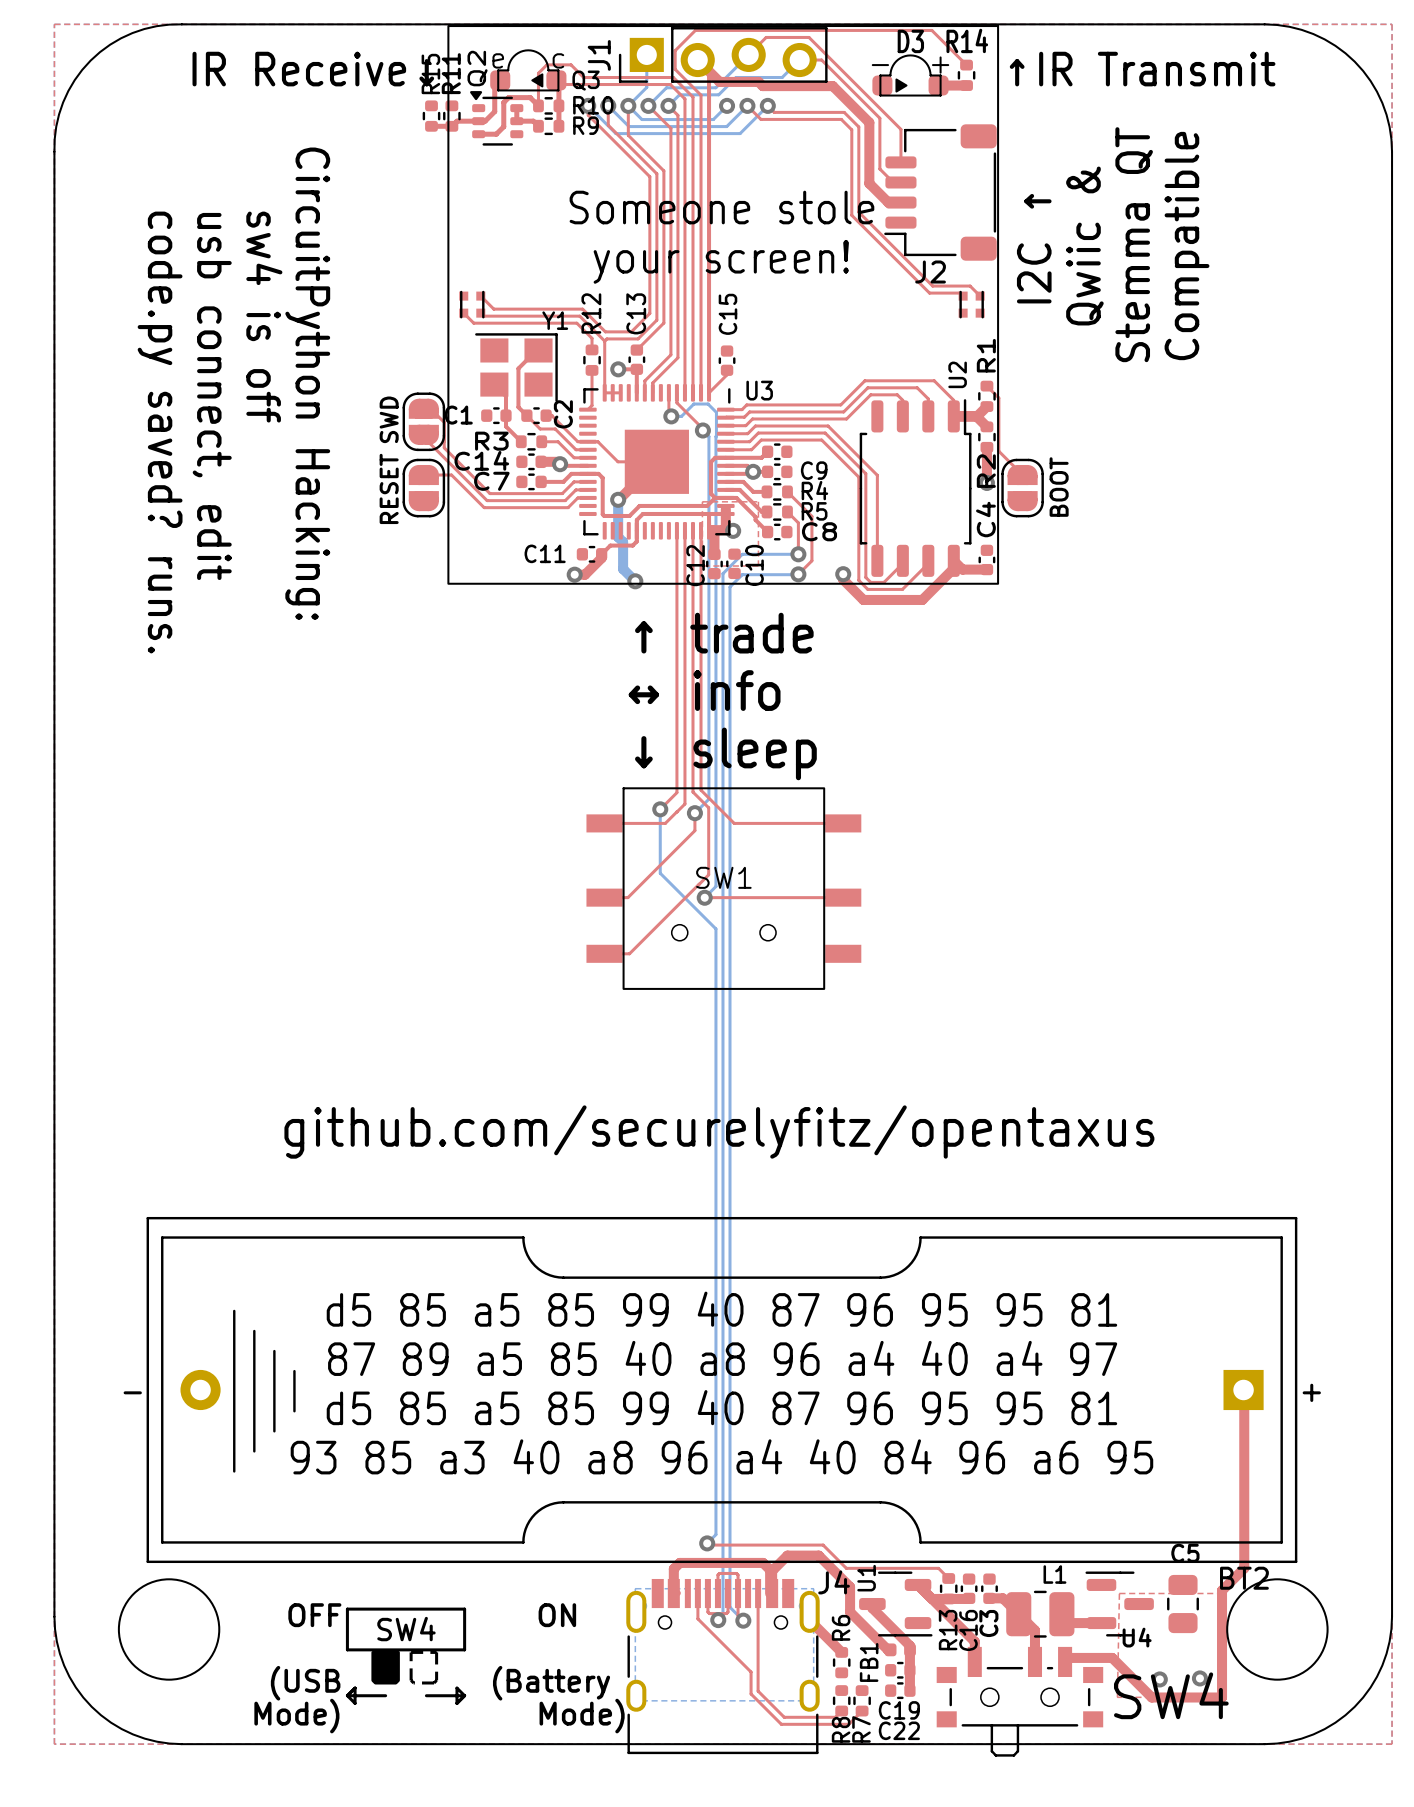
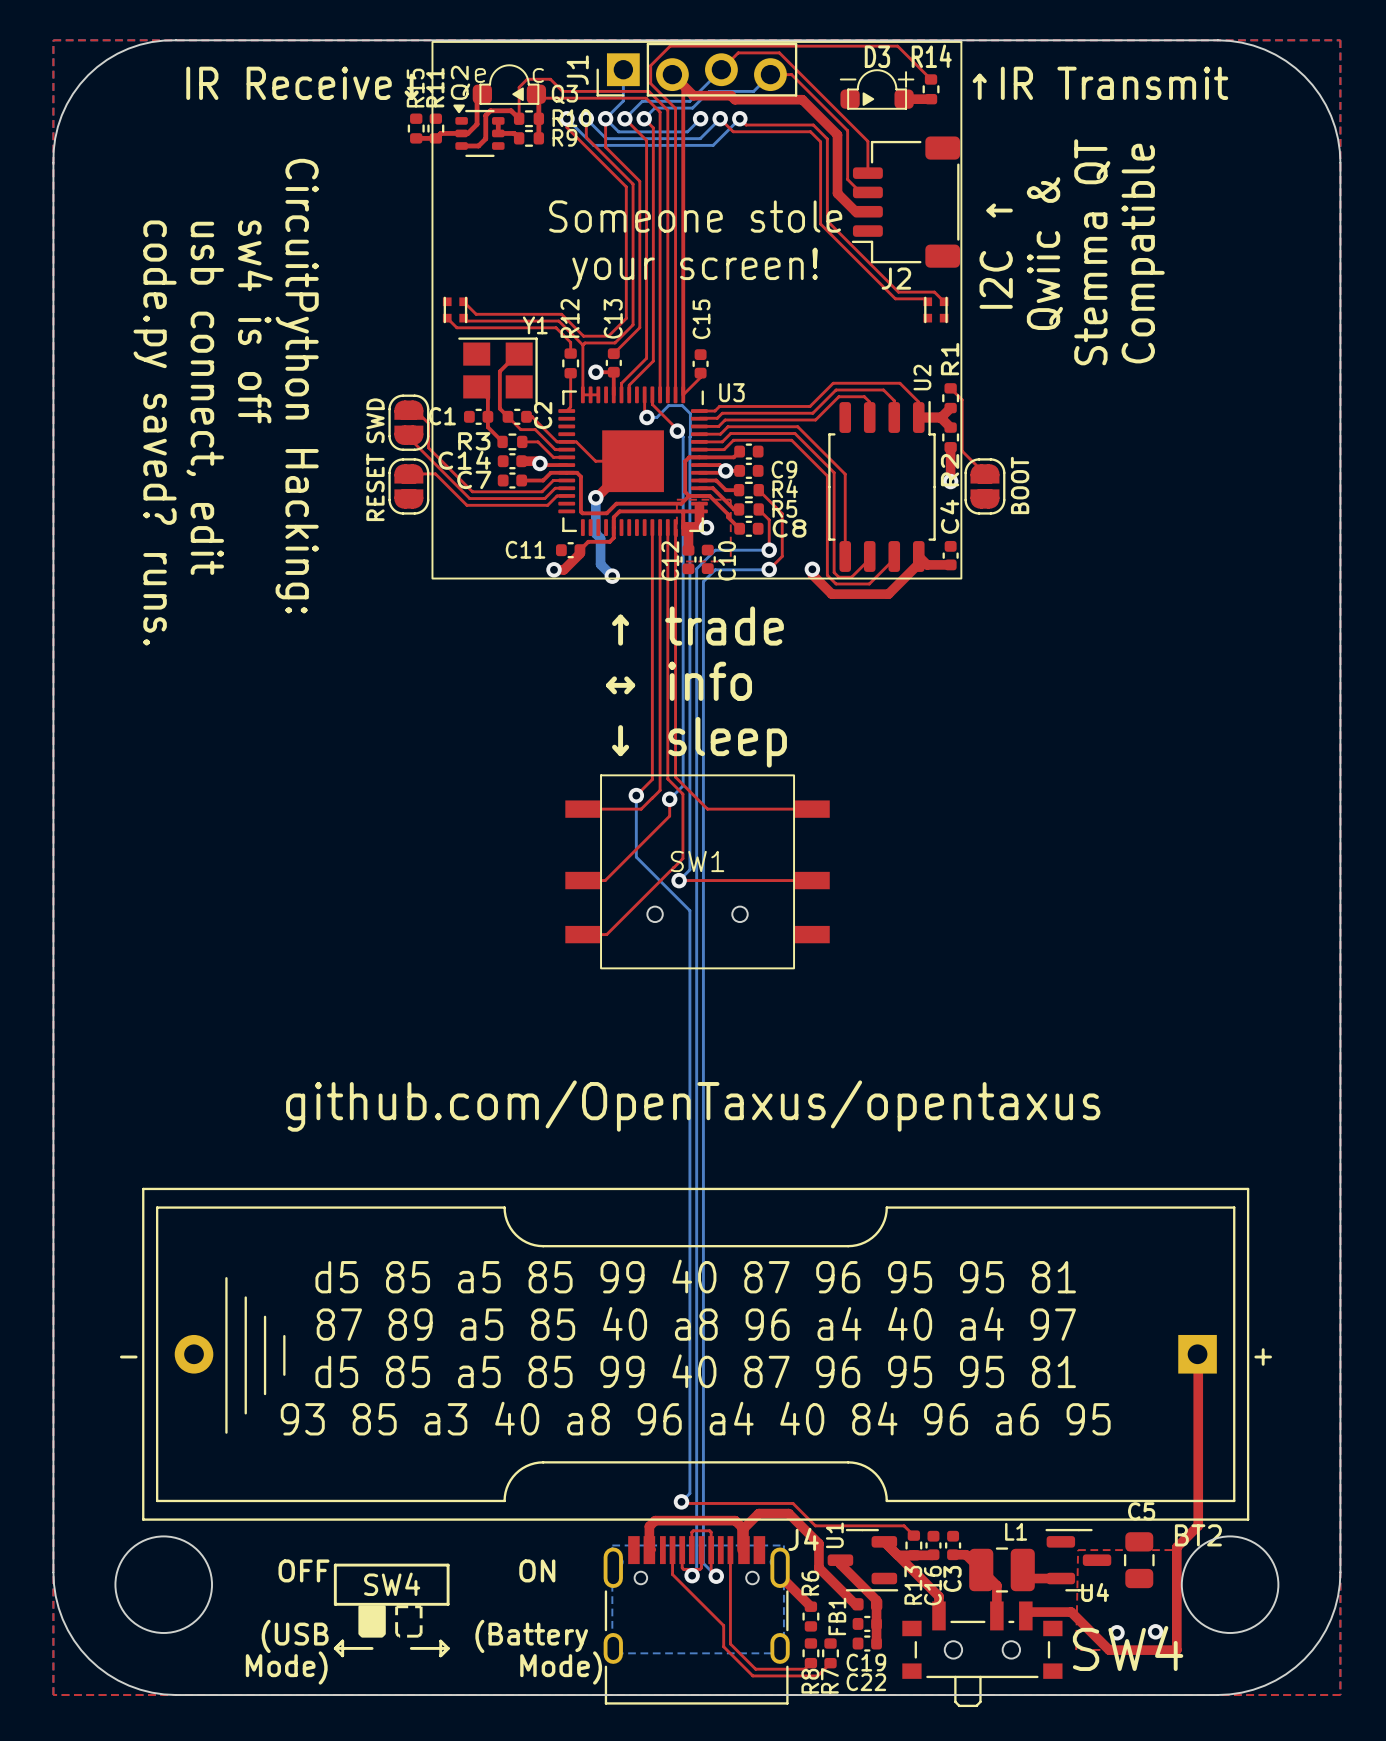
text: github.com/securelyfitz/opentaxus (719, 1132) -> github.com/OpenTaxus/opentaxus (693, 1106)

